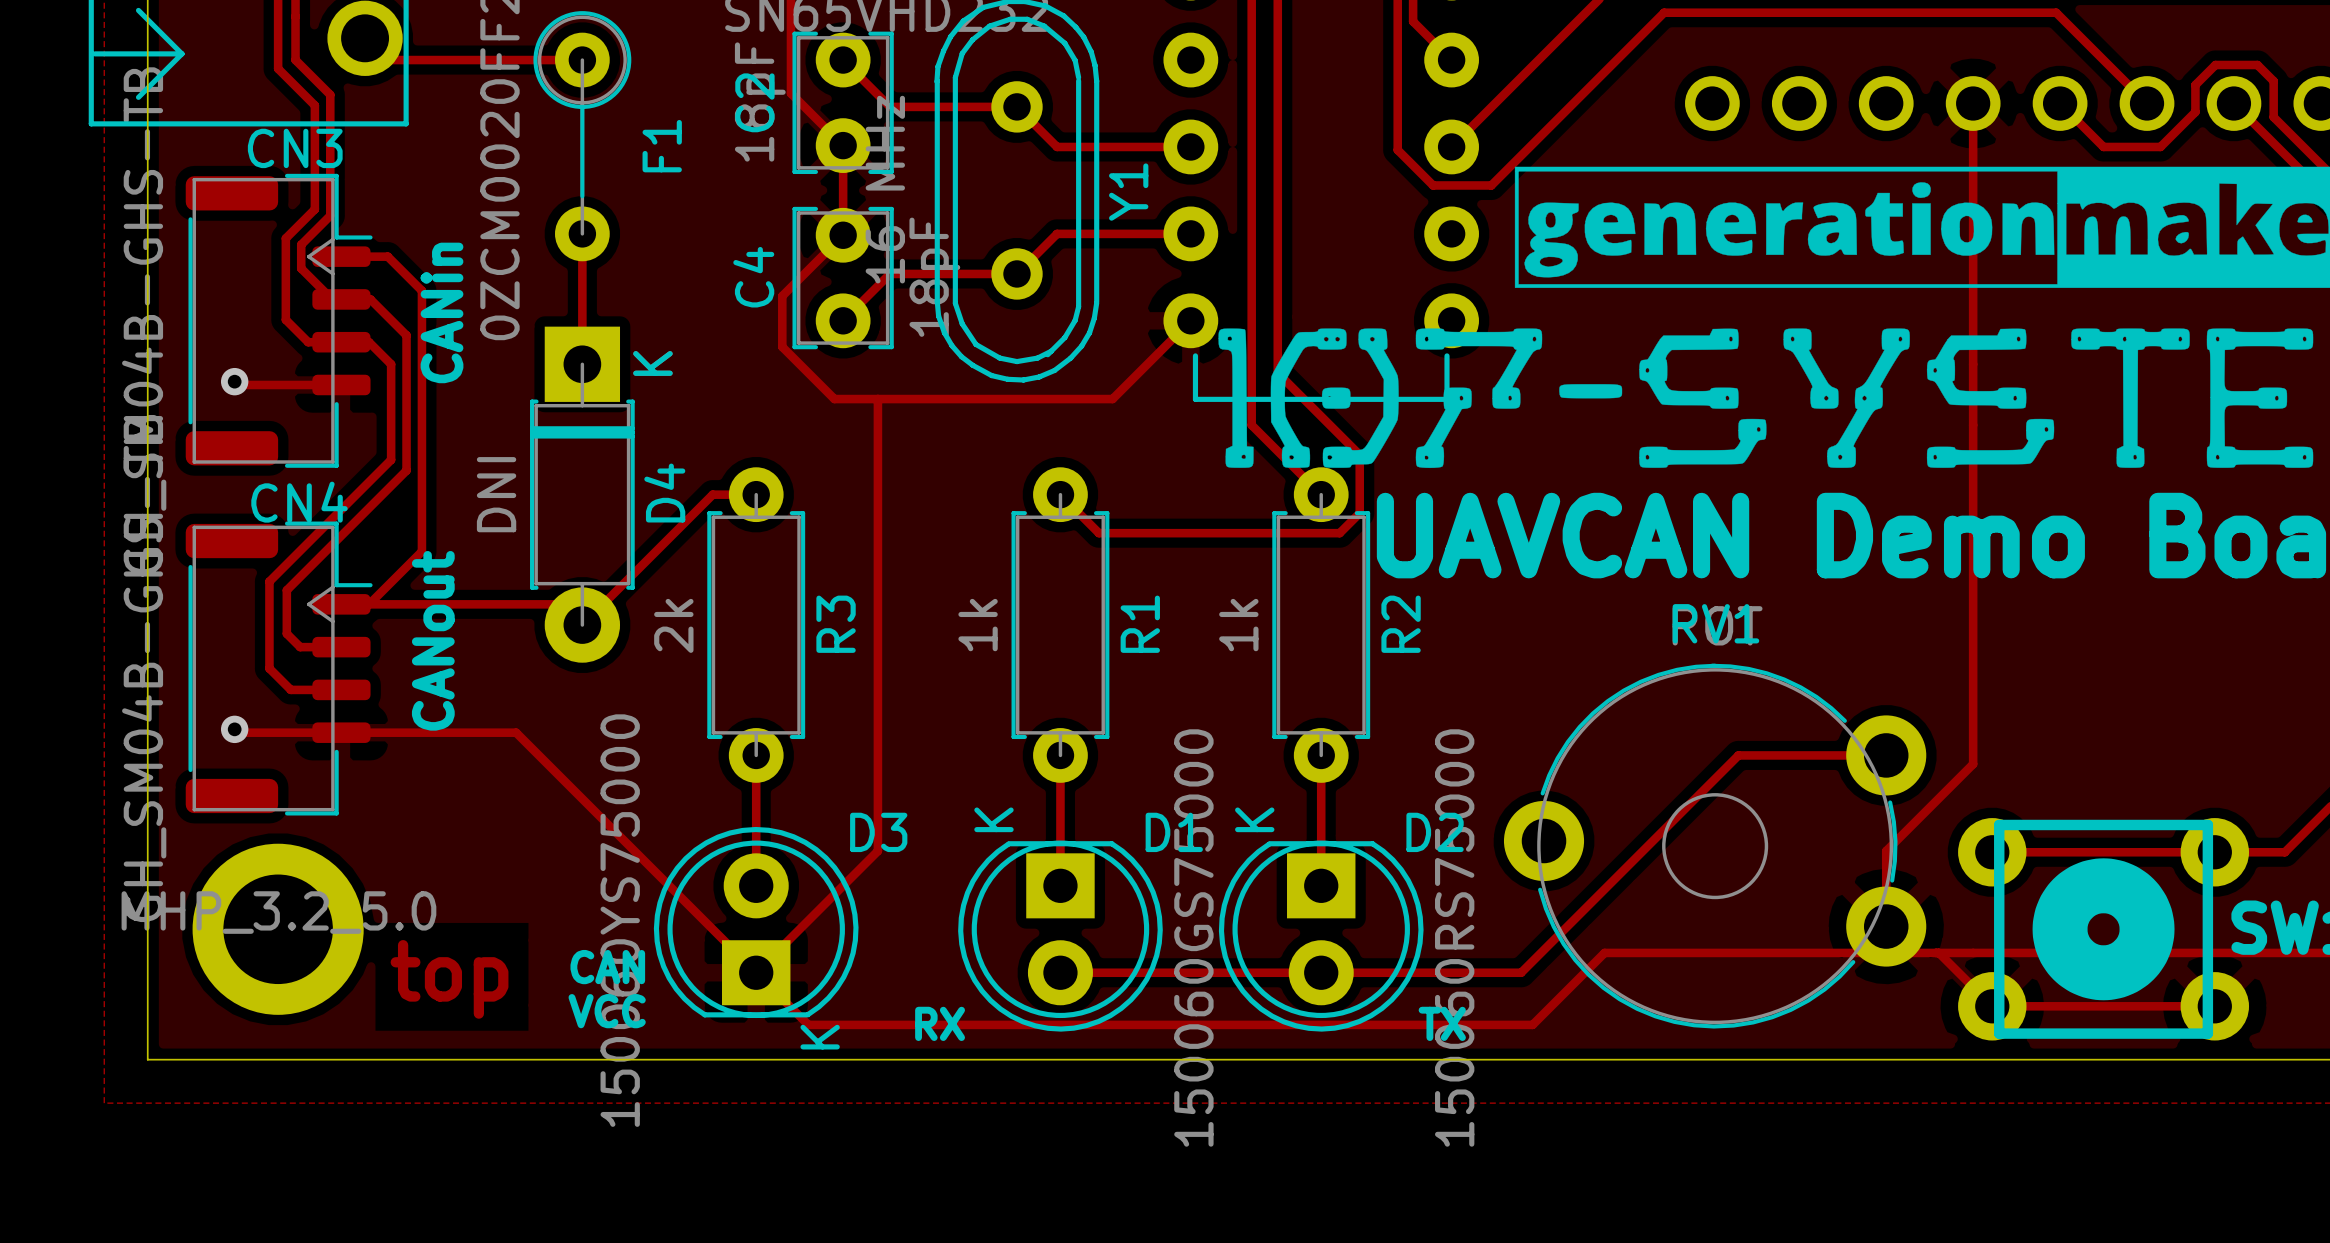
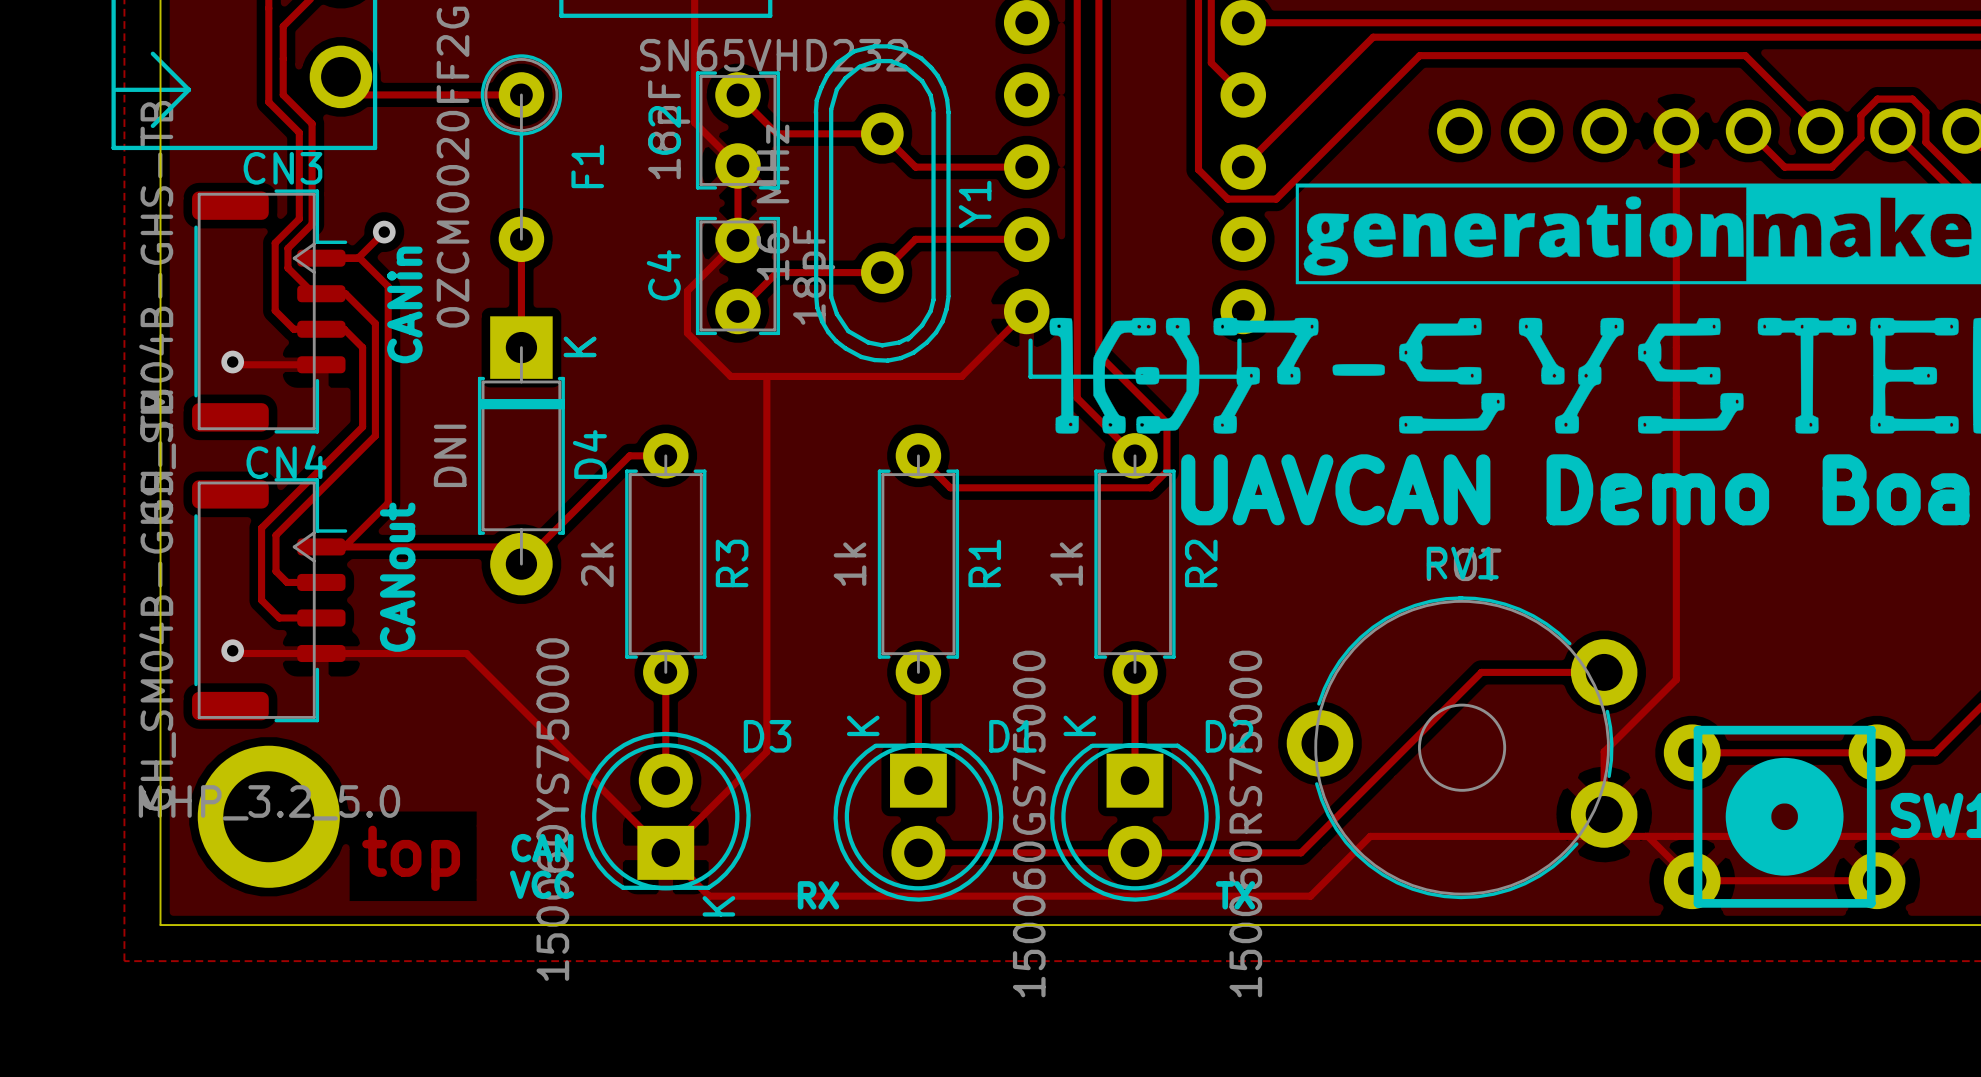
track: none -> (384, 232) (358, 258)
via: none -> (384, 232)

